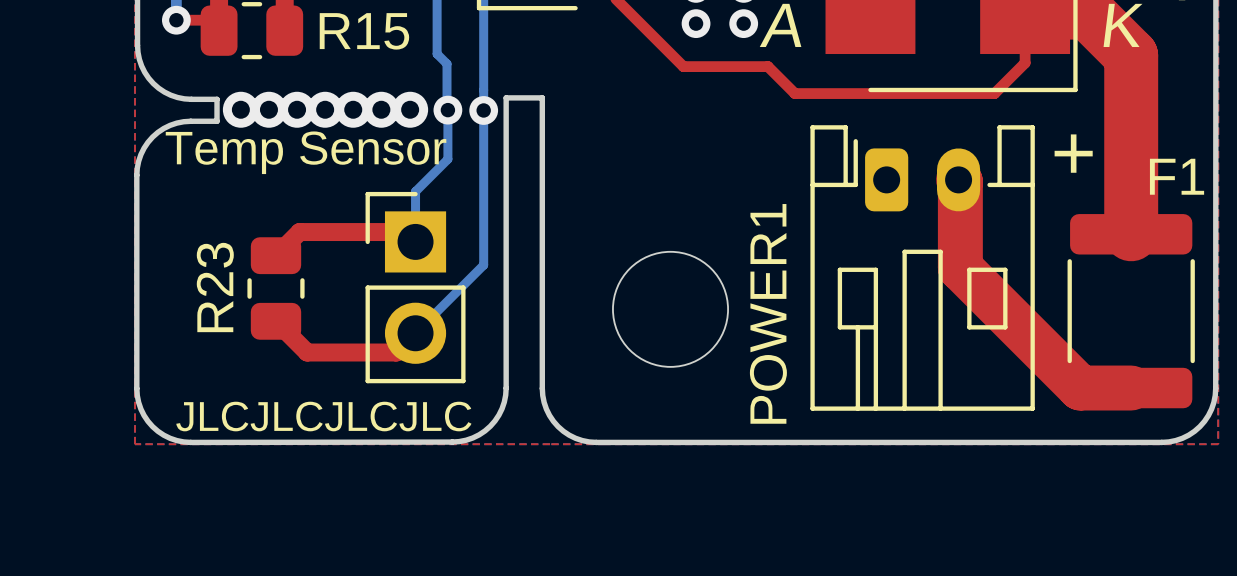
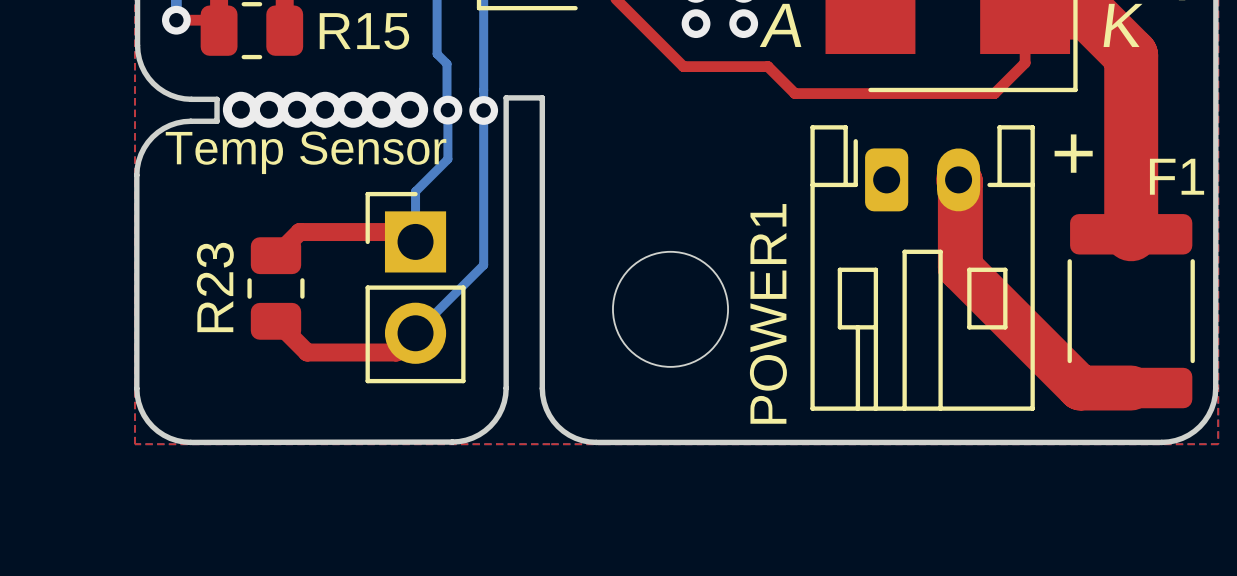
text: JLCJLCJLCJLC (323, 416) -> none

